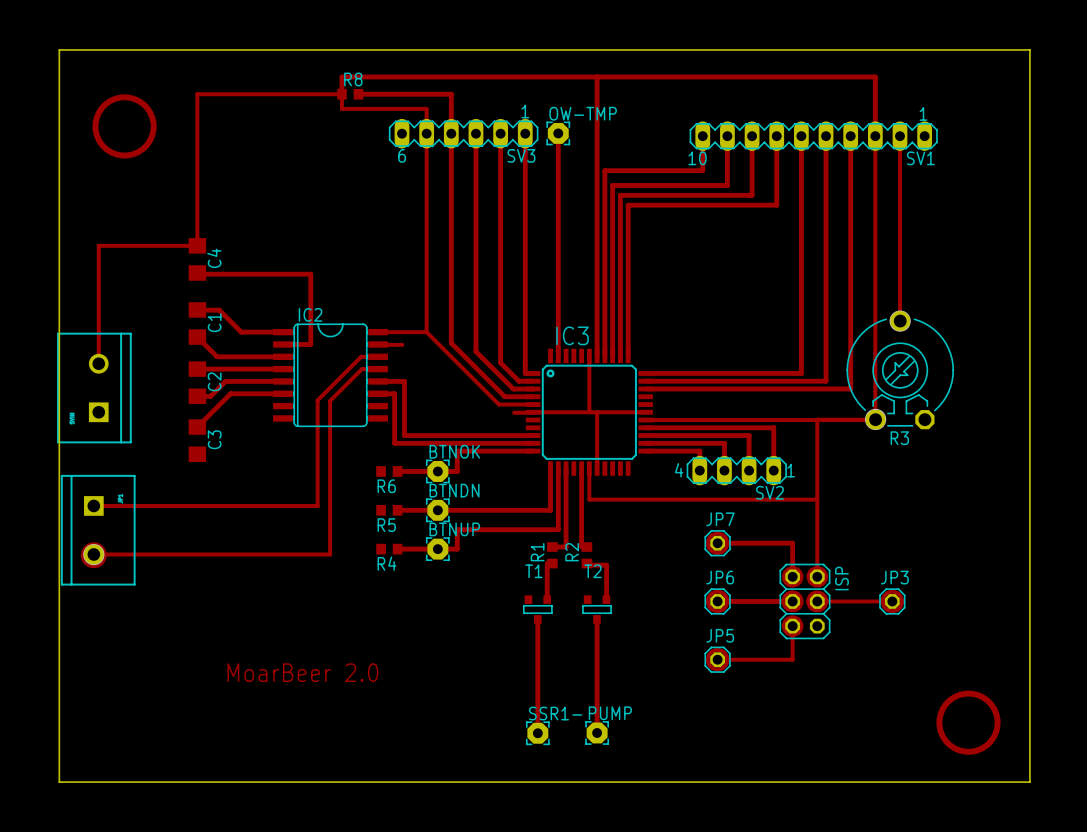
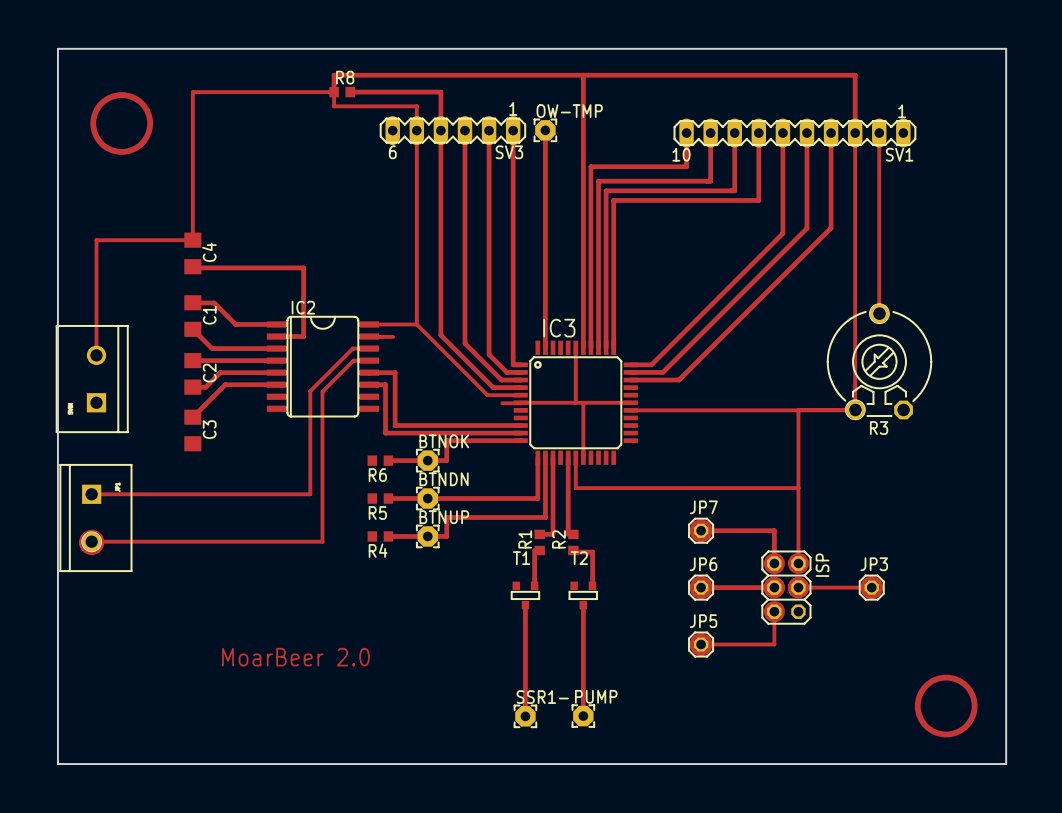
track: (826, 233) (826, 381) (678, 381) -> (806, 228) (662, 372)
track: (850, 233) (850, 388) (695, 388) -> (831, 227) (679, 380)
track: (801, 238) (801, 373) (666, 373) -> (782, 233) (651, 364)
track: (645, 427) (773, 427) (773, 470) -> none
track: (645, 435) (749, 435) (749, 470) -> none
track: (645, 443) (724, 443) (724, 470) -> none
track: (645, 451) (699, 451) (699, 470) -> none
SV2: (736, 470) -> none

